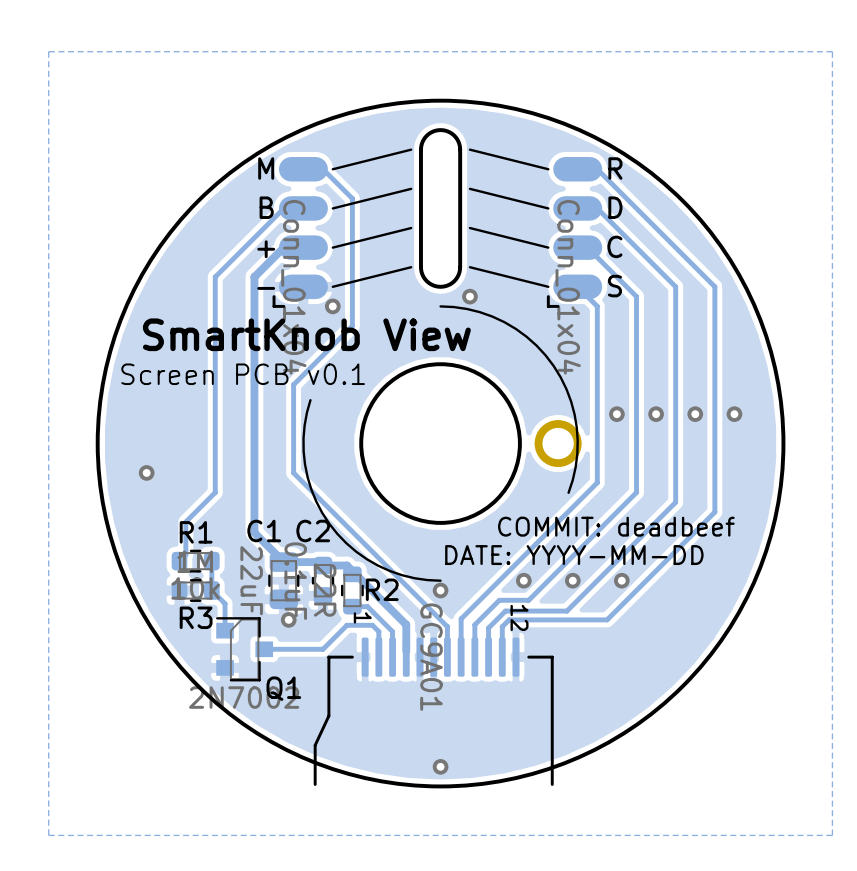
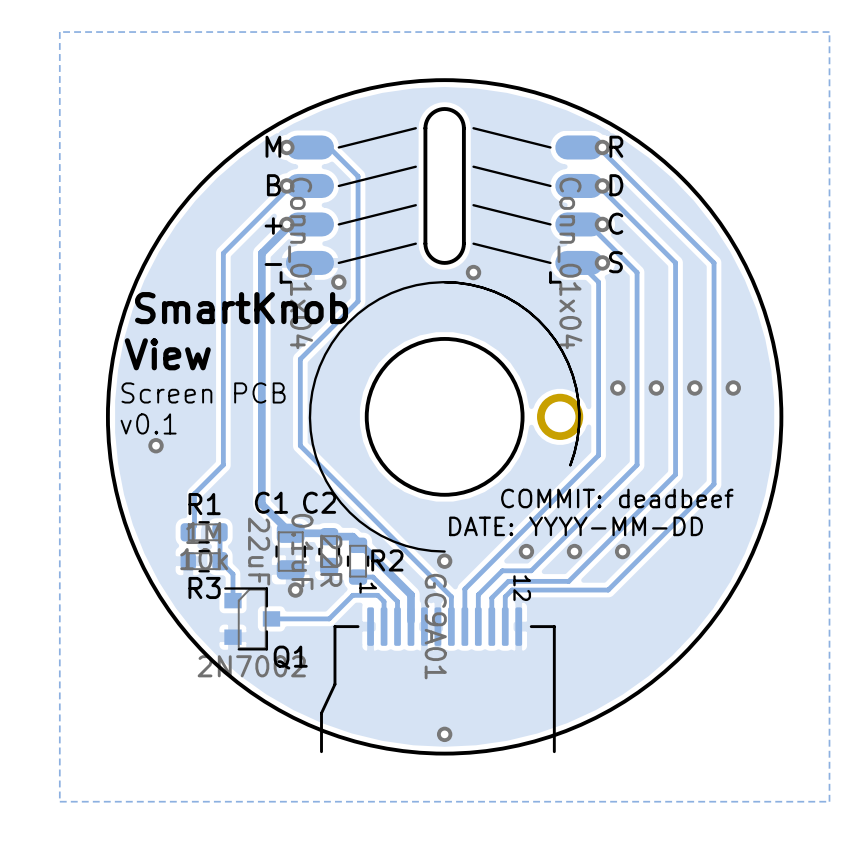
via: none -> (286, 147)
via: none -> (602, 147)
via: none -> (286, 185)
via: none -> (602, 185)
via: none -> (286, 224)
via: none -> (602, 224)
via: none -> (602, 262)
text: SmartKnob View (306, 334) -> SmartKnob (241, 308)
text: Screen PCB v0.1 (243, 374) -> View (167, 354)
line: (310, 400) (303, 438) (304, 464) (316, 501) (329, 523) (356, 551) (378, 565) (414, 578) (440, 580) -> (570, 465) (577, 439) (579, 413) (572, 374) (555, 339) (528, 311) (493, 291) (455, 282) (429, 283) (403, 288) (368, 305) (339, 332) (319, 366) (310, 404) (310, 431) (316, 456) (333, 492) (359, 521) (381, 535) (405, 545) (444, 551)
text: none -> Screen PCB (203, 392)
text: none -> v0.1 (148, 423)

